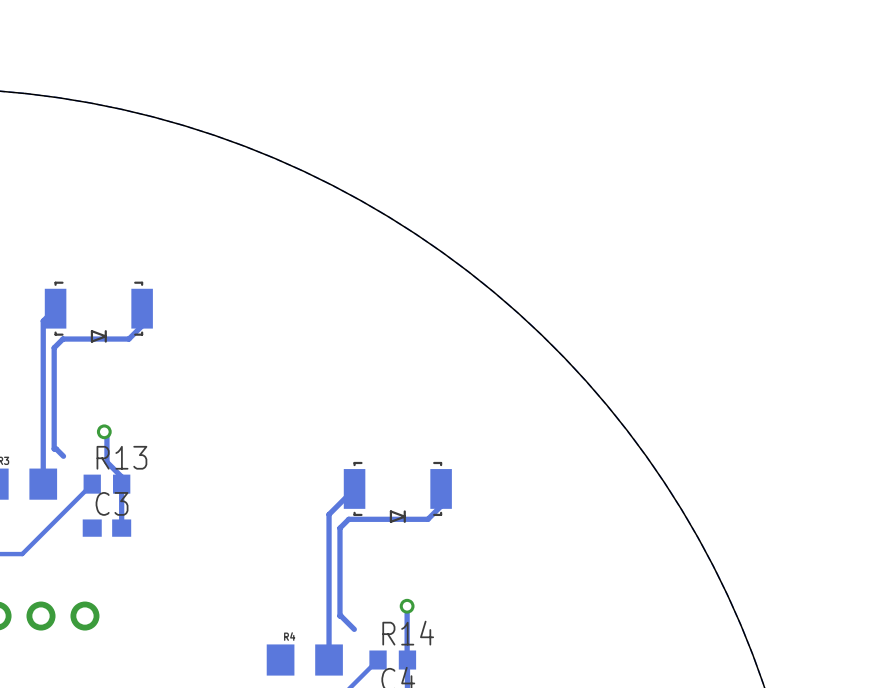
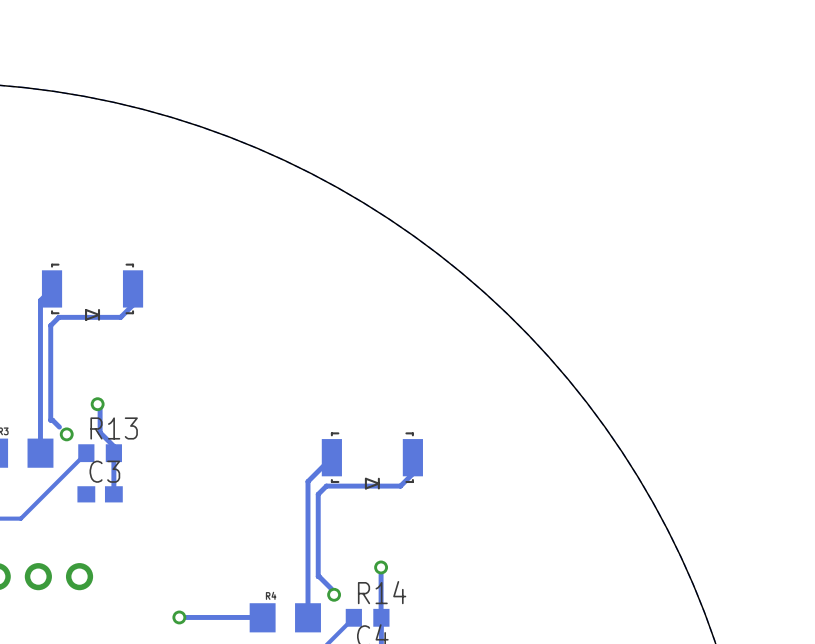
via: none -> (66, 434)
via: none -> (334, 594)
track: none -> (179, 617) (262, 617)
via: none -> (179, 617)

